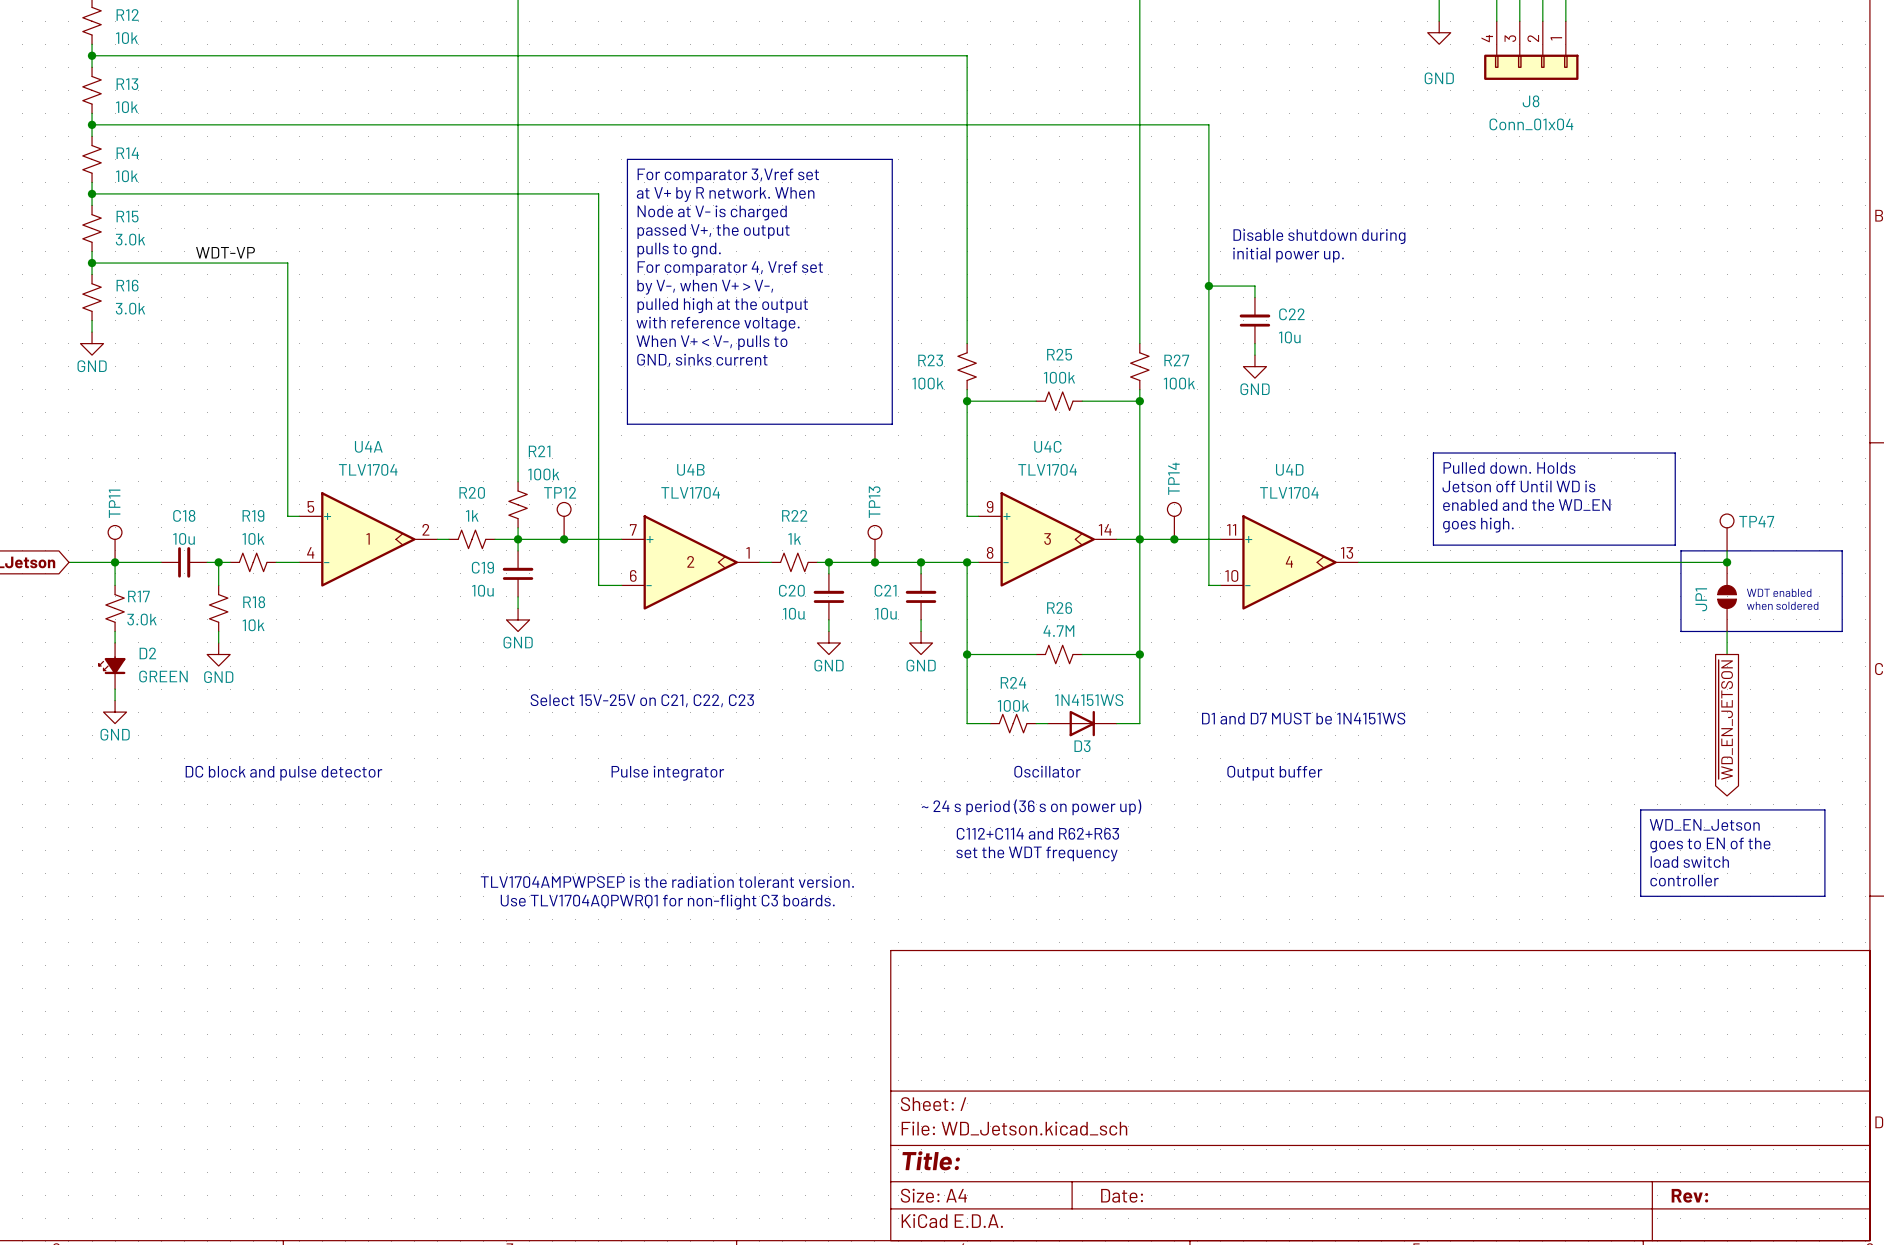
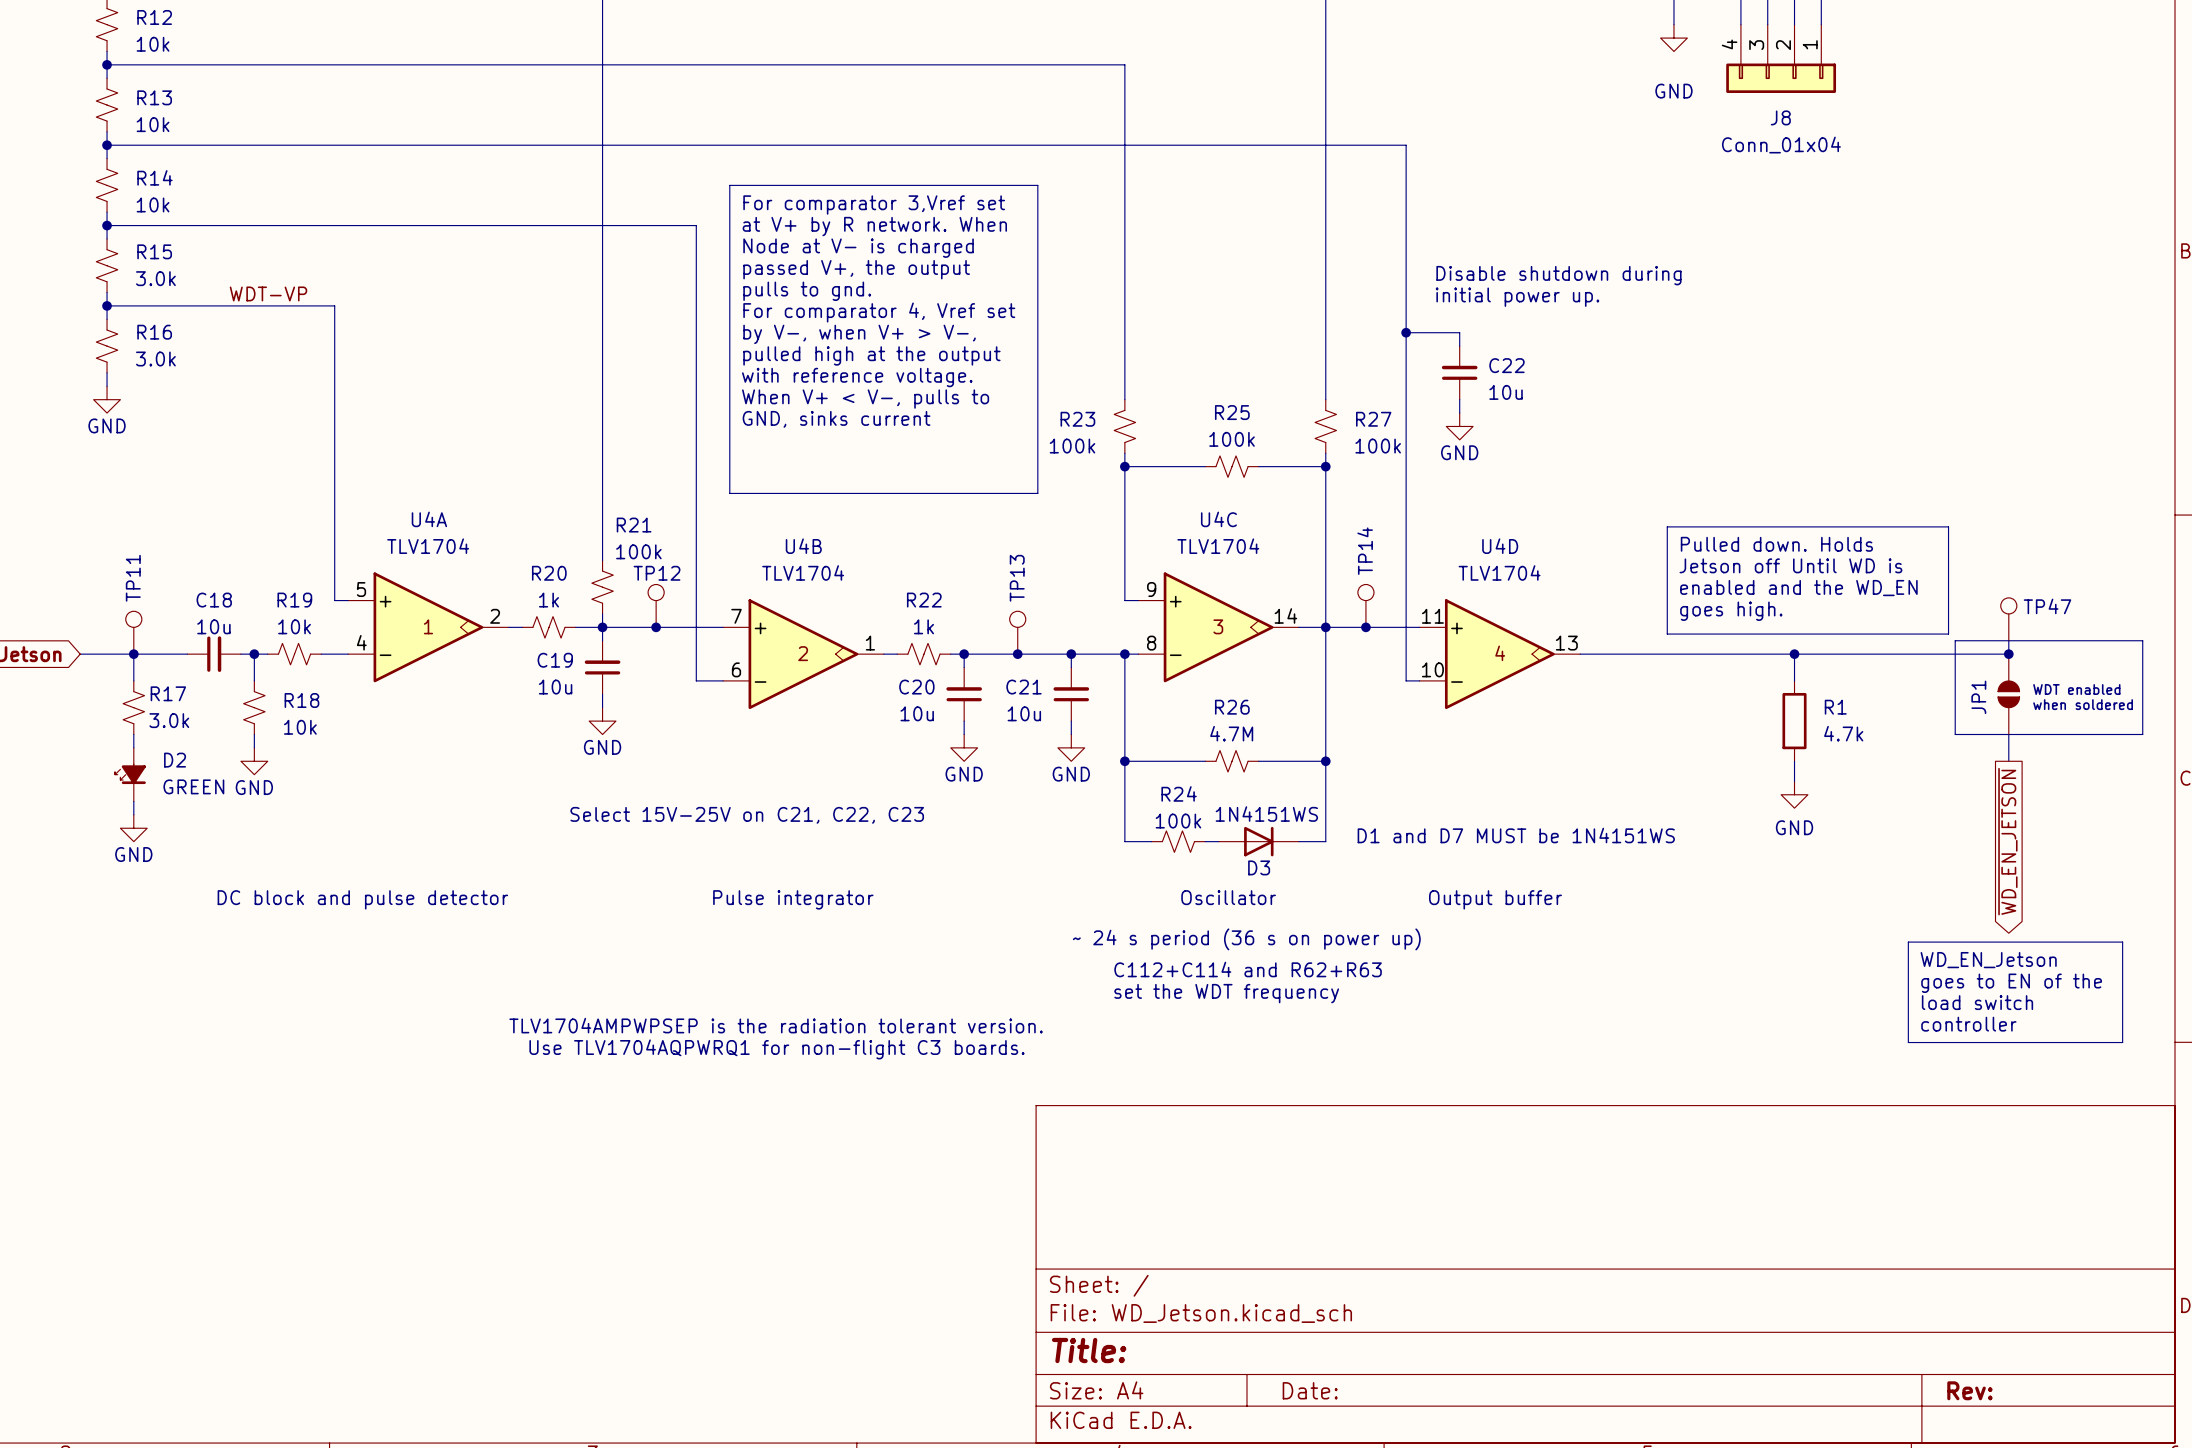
wire: none -> (1794, 654) (1794, 680)
junction: none -> (1794, 654)
R1: none -> 4.7k (1794, 721)
wire: none -> (1794, 761) (1794, 781)
power symbol: none -> GND (1794, 794)

